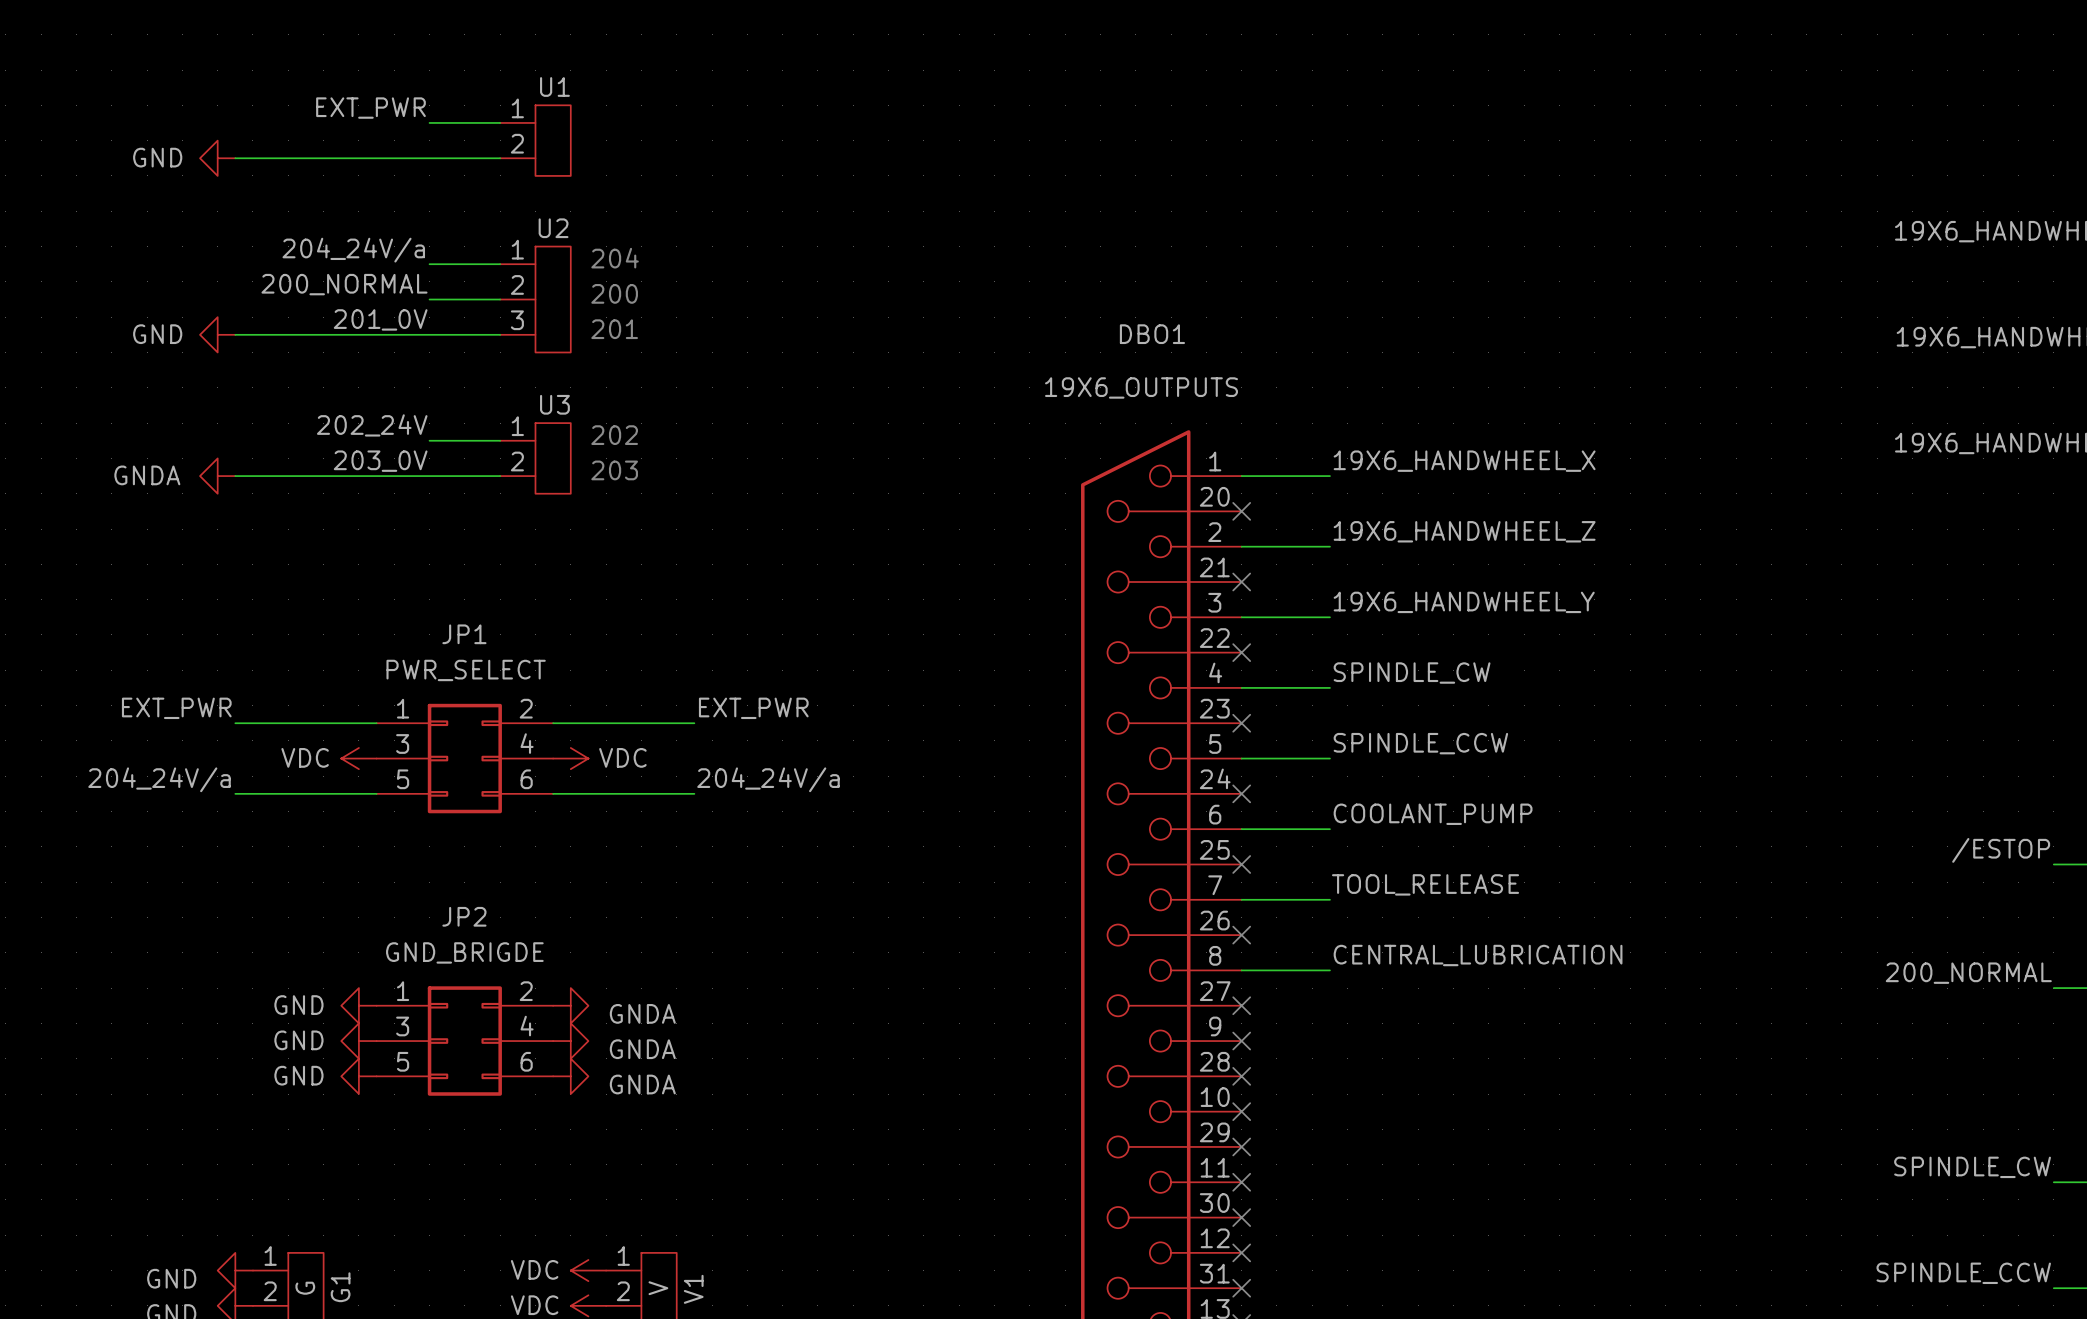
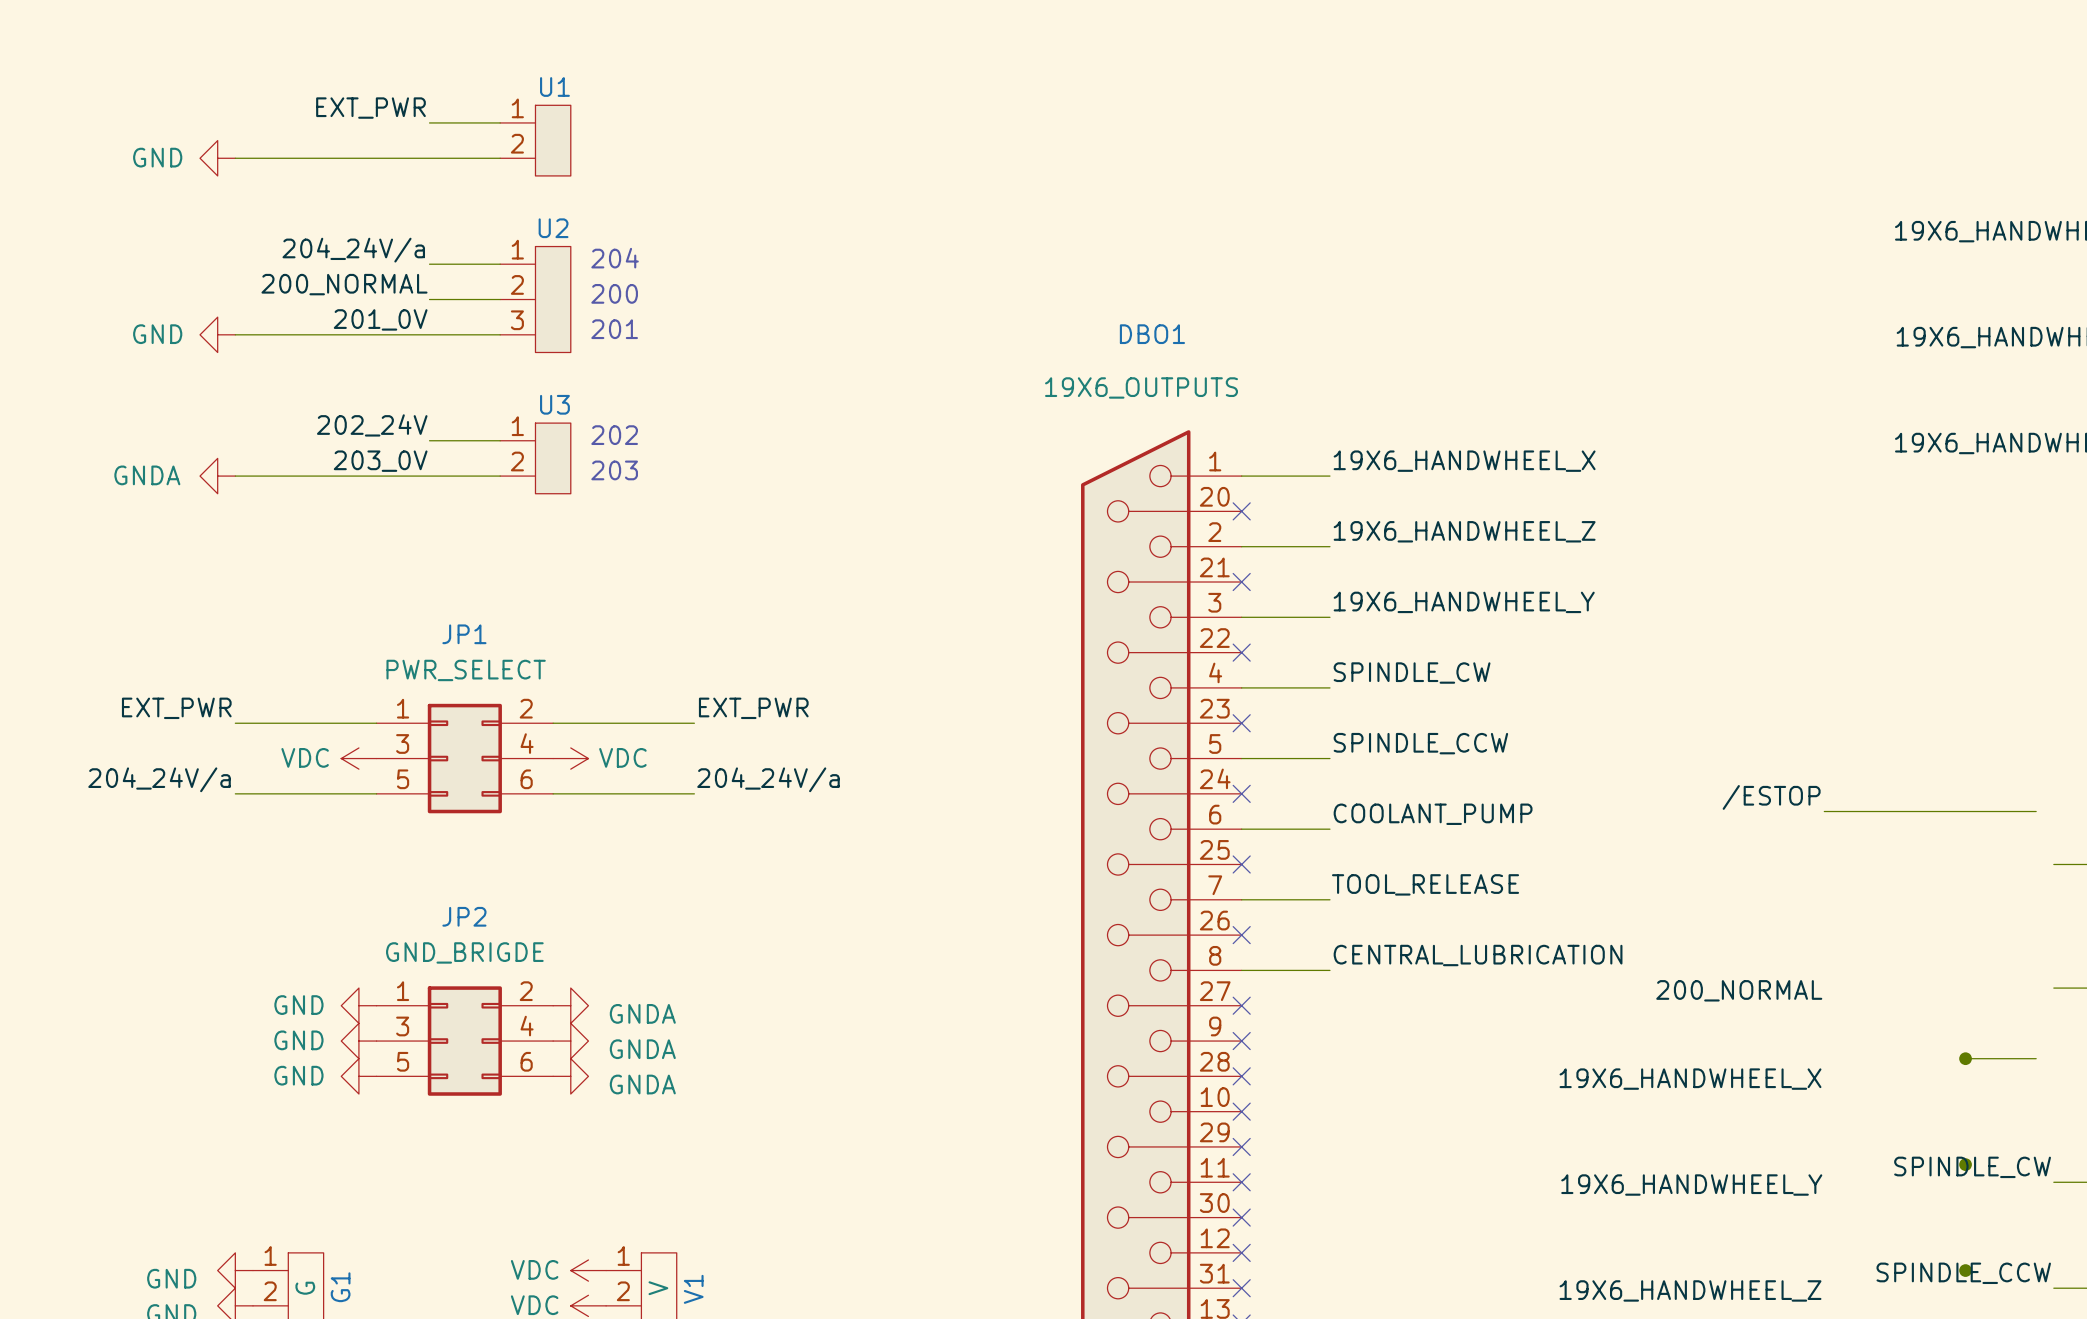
wire: none -> (1824, 811) (2036, 811)
label position: /ESTOP (2001, 850) -> /ESTOP (1771, 797)
label position: 200_NORMAL (1968, 973) -> 200_NORMAL (1739, 990)
wire: none -> (1965, 1058) (2036, 1058)
junction: none -> (1965, 1058)
label: none -> 19X6_HANDWHEEL_X (1690, 1079)
junction: none -> (1965, 1164)
label: none -> 19X6_HANDWHEEL_Y (1691, 1185)
junction: none -> (1965, 1270)
label: none -> 19X6_HANDWHEEL_Z (1690, 1290)

